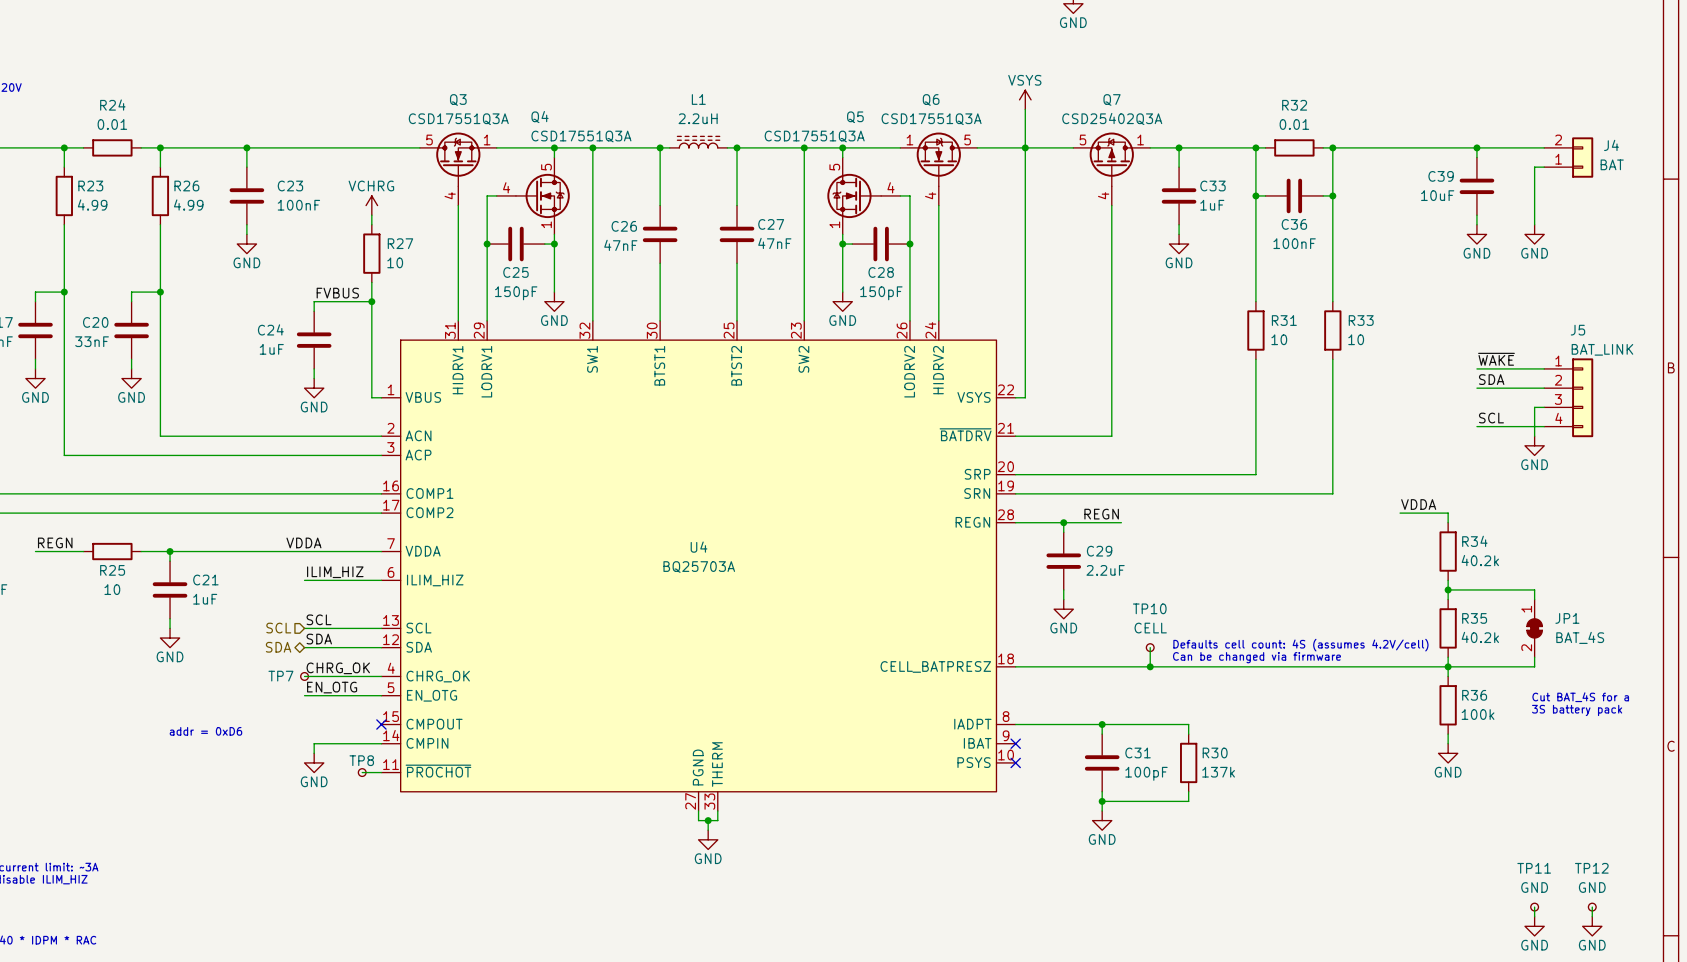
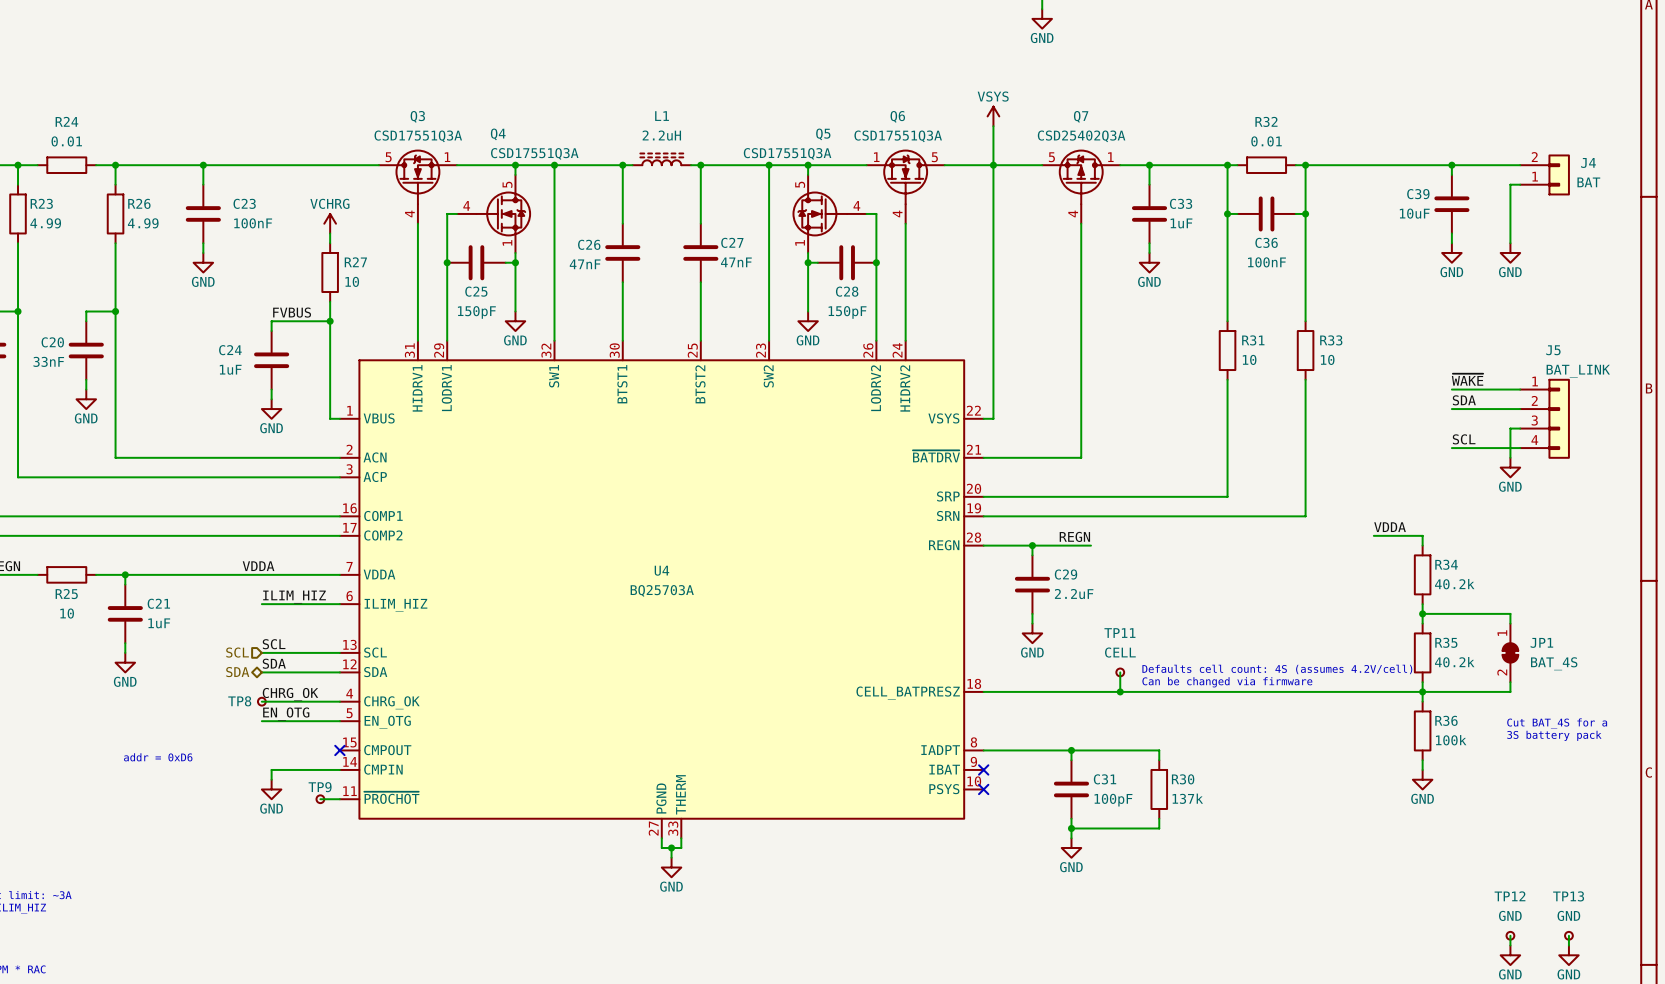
TP10 name: TP10 (1149, 608) -> TP11 (1119, 633)
TP7 name: TP7 (280, 676) -> TP8 (239, 701)
TP8 name: TP8 (361, 760) -> TP9 (320, 787)
TP11 name: TP11 (1534, 868) -> TP12 (1510, 896)
TP12 name: TP12 (1591, 868) -> TP13 (1568, 896)

